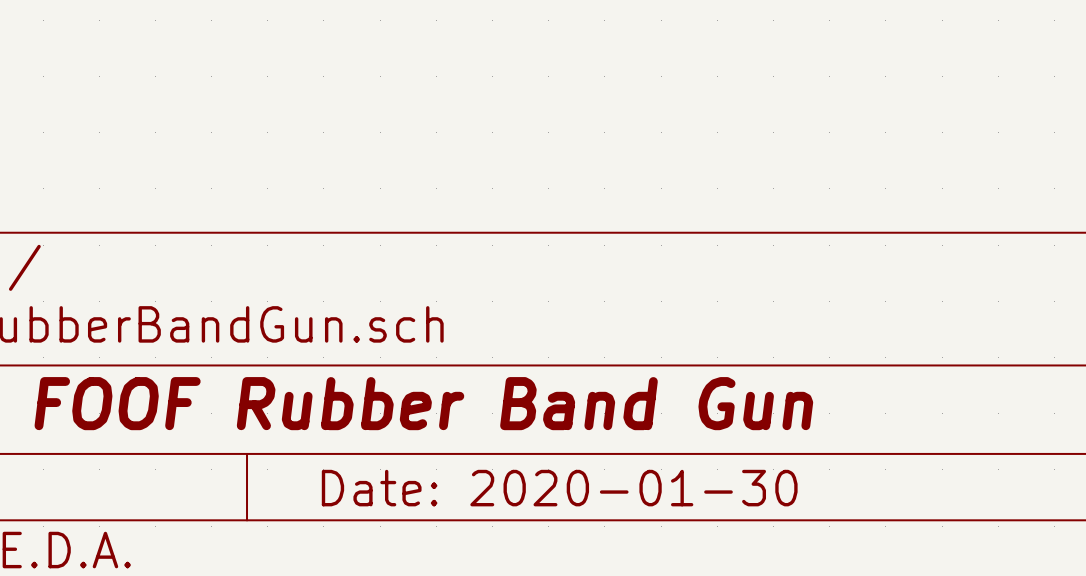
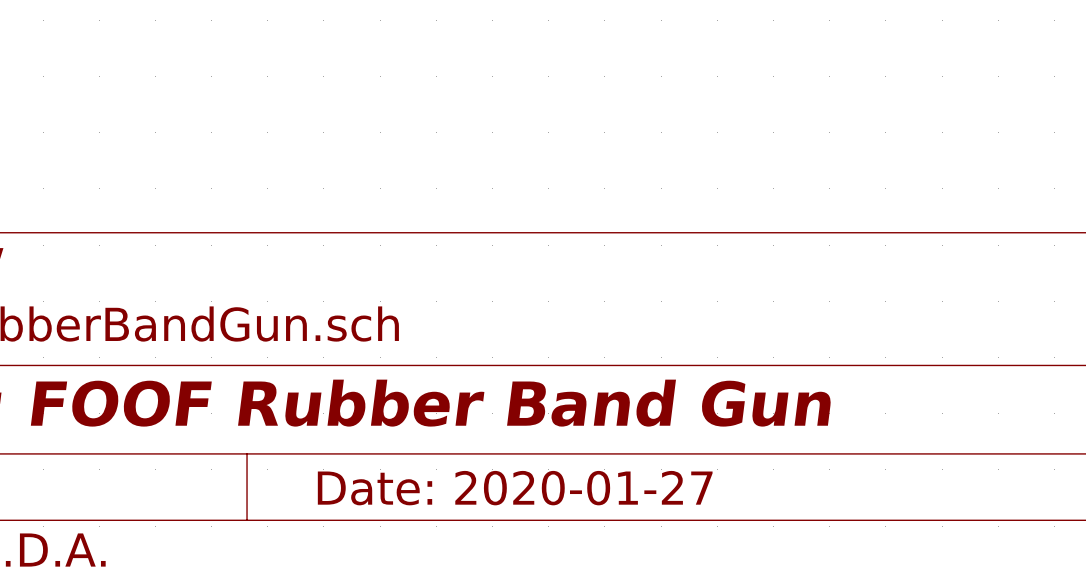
title block: Date: 2020-01-30 (559, 488) -> Date: 2020-01-27 (515, 488)

